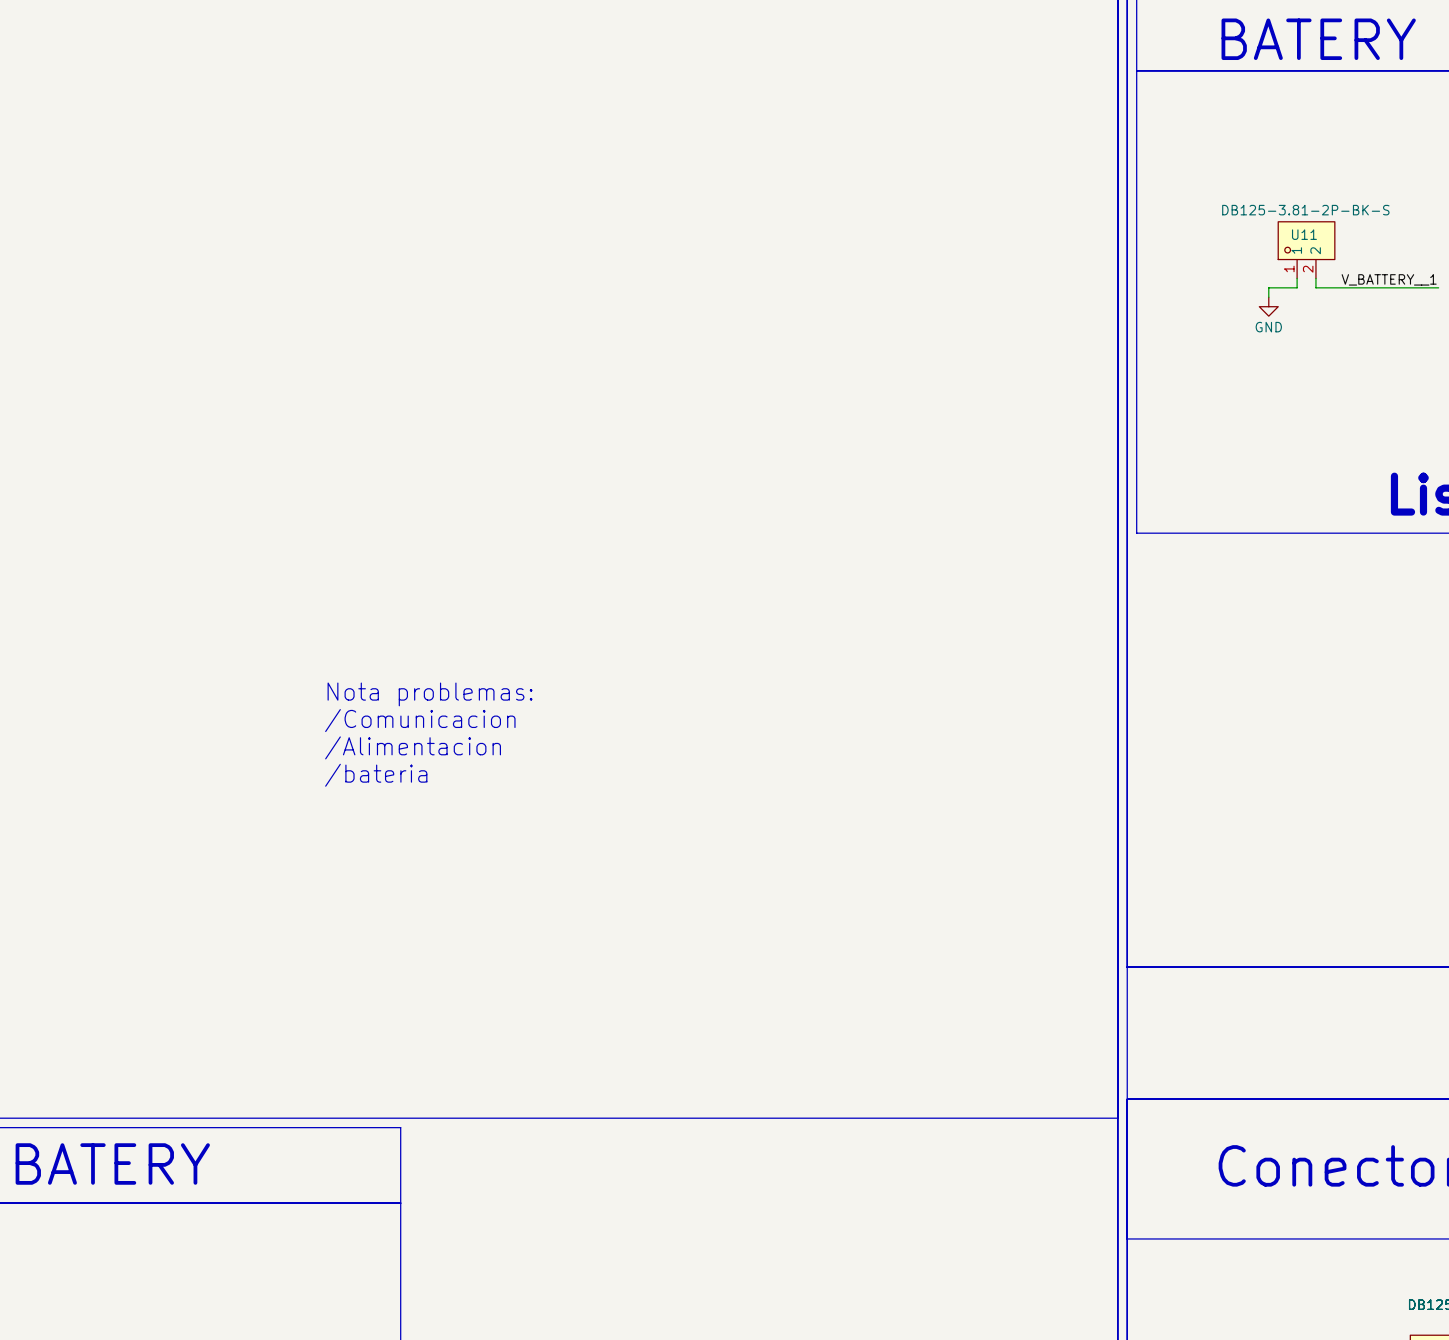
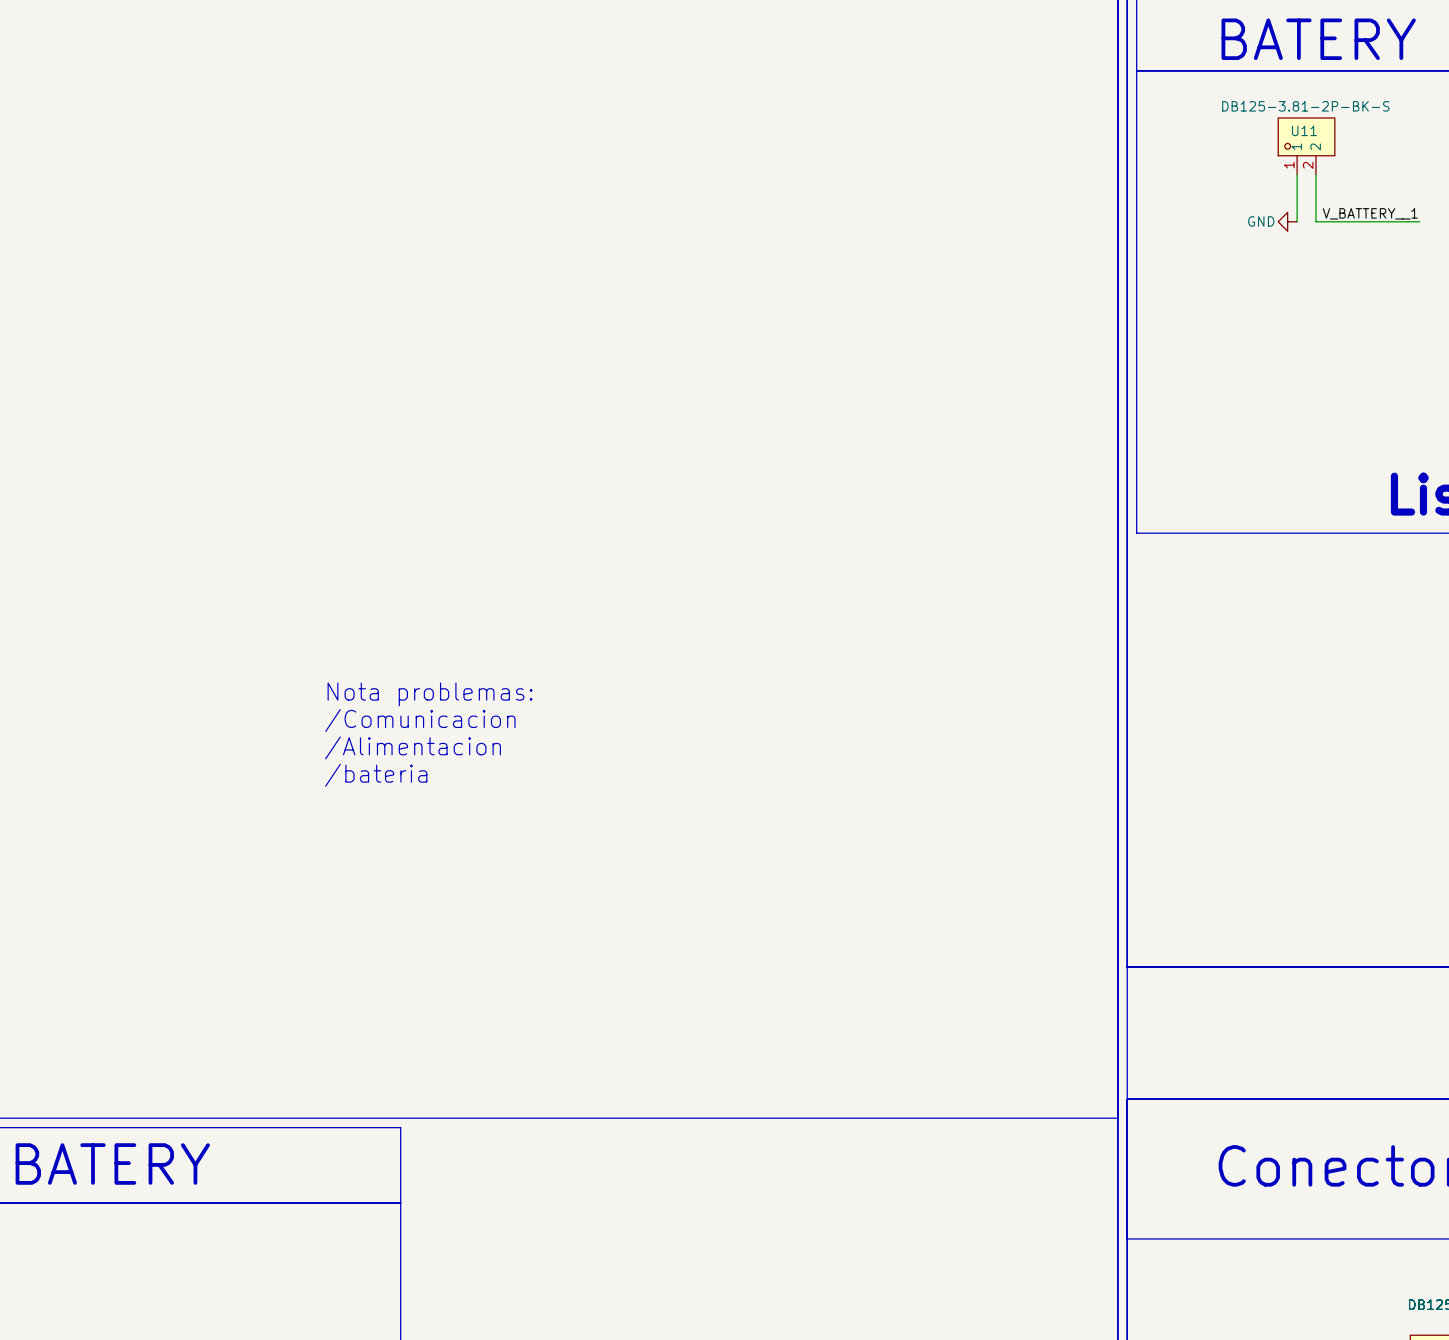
wire: none -> (1297, 174) (1297, 221)
wire: none -> (1315, 174) (1315, 221) (1419, 221)
U11 position: (1306, 250) -> (1306, 146)
wire: (1297, 278) (1297, 287) (1268, 287) (1268, 297) -> none
wire: (1315, 278) (1315, 287) (1438, 287) -> none
label position: V_BATTERY__1 (1389, 279) -> V_BATTERY__1 (1370, 213)
power symbol rotation: 0° (1268, 306) -> 90° clockwise (1287, 221)
power symbol position: GND (1268, 306) -> GND (1287, 221)

